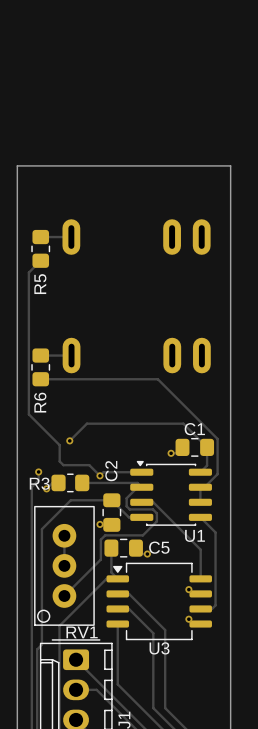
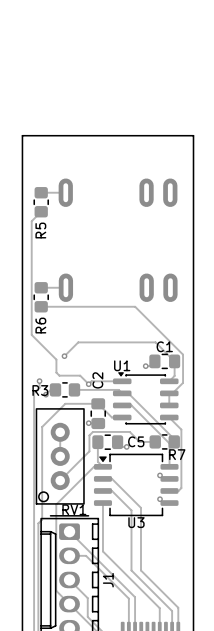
track: (137, 487) (126, 498) (126, 506) (129, 509) (152, 509) (156, 513) (156, 521) (142, 535) -> (155, 441) (139, 441) (129, 431) (123, 431)
track: none -> (125, 393) (128, 393) (174, 439) (174, 441)
U1 name position: U1 (195, 535) -> U1 (122, 365)
R7: none -> (164, 441)

